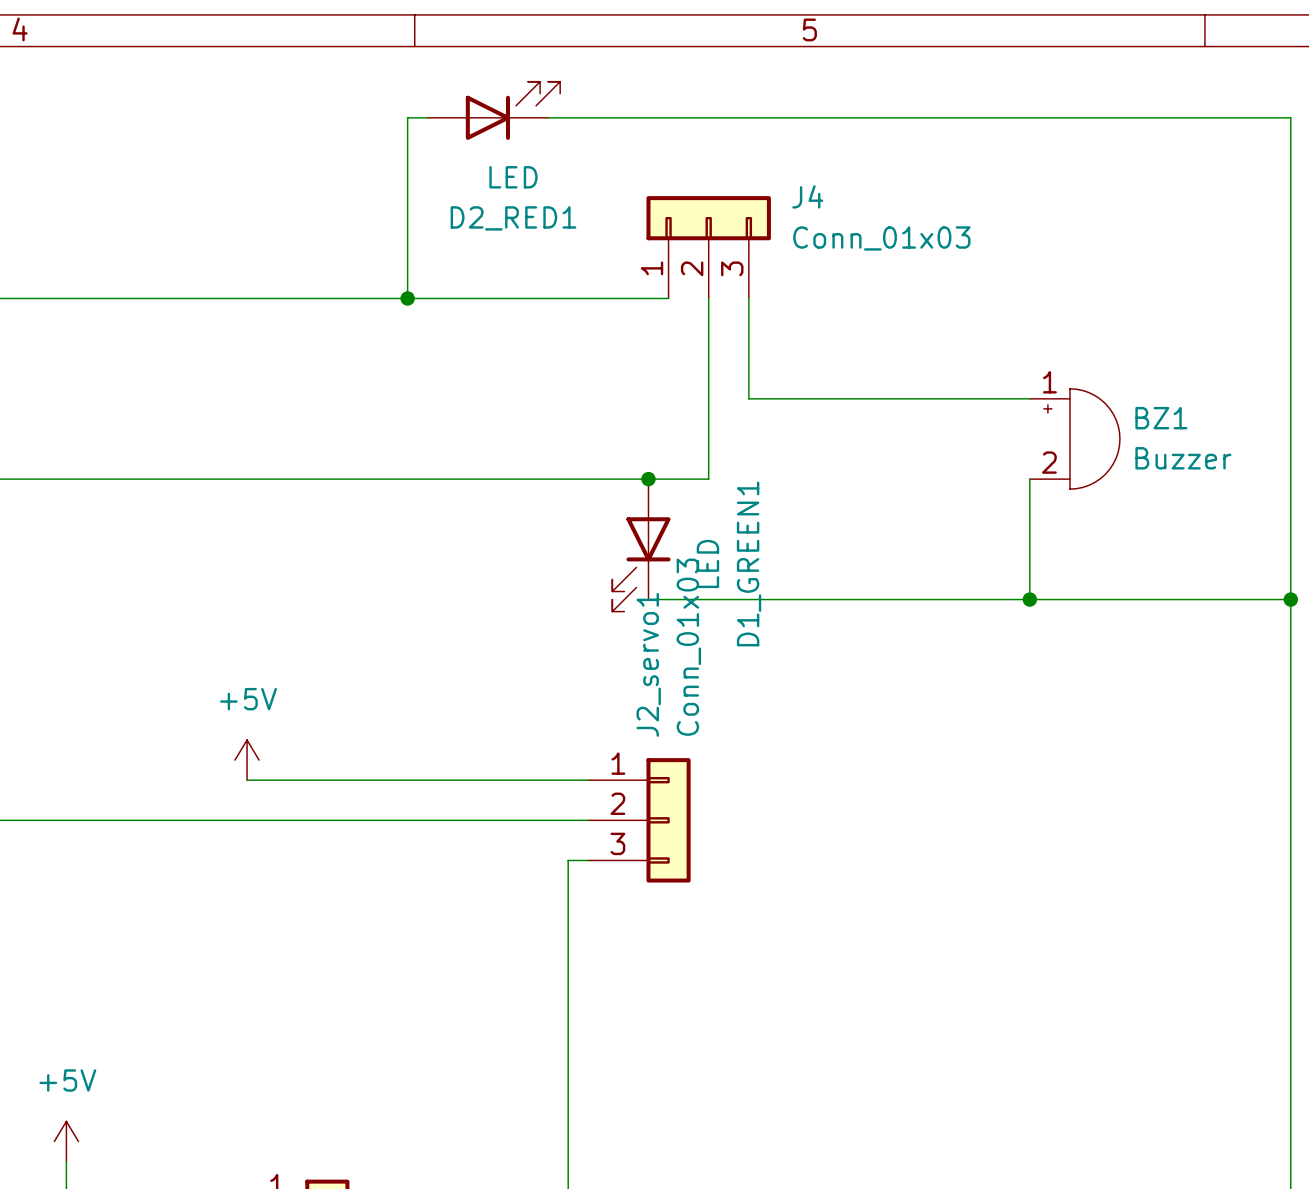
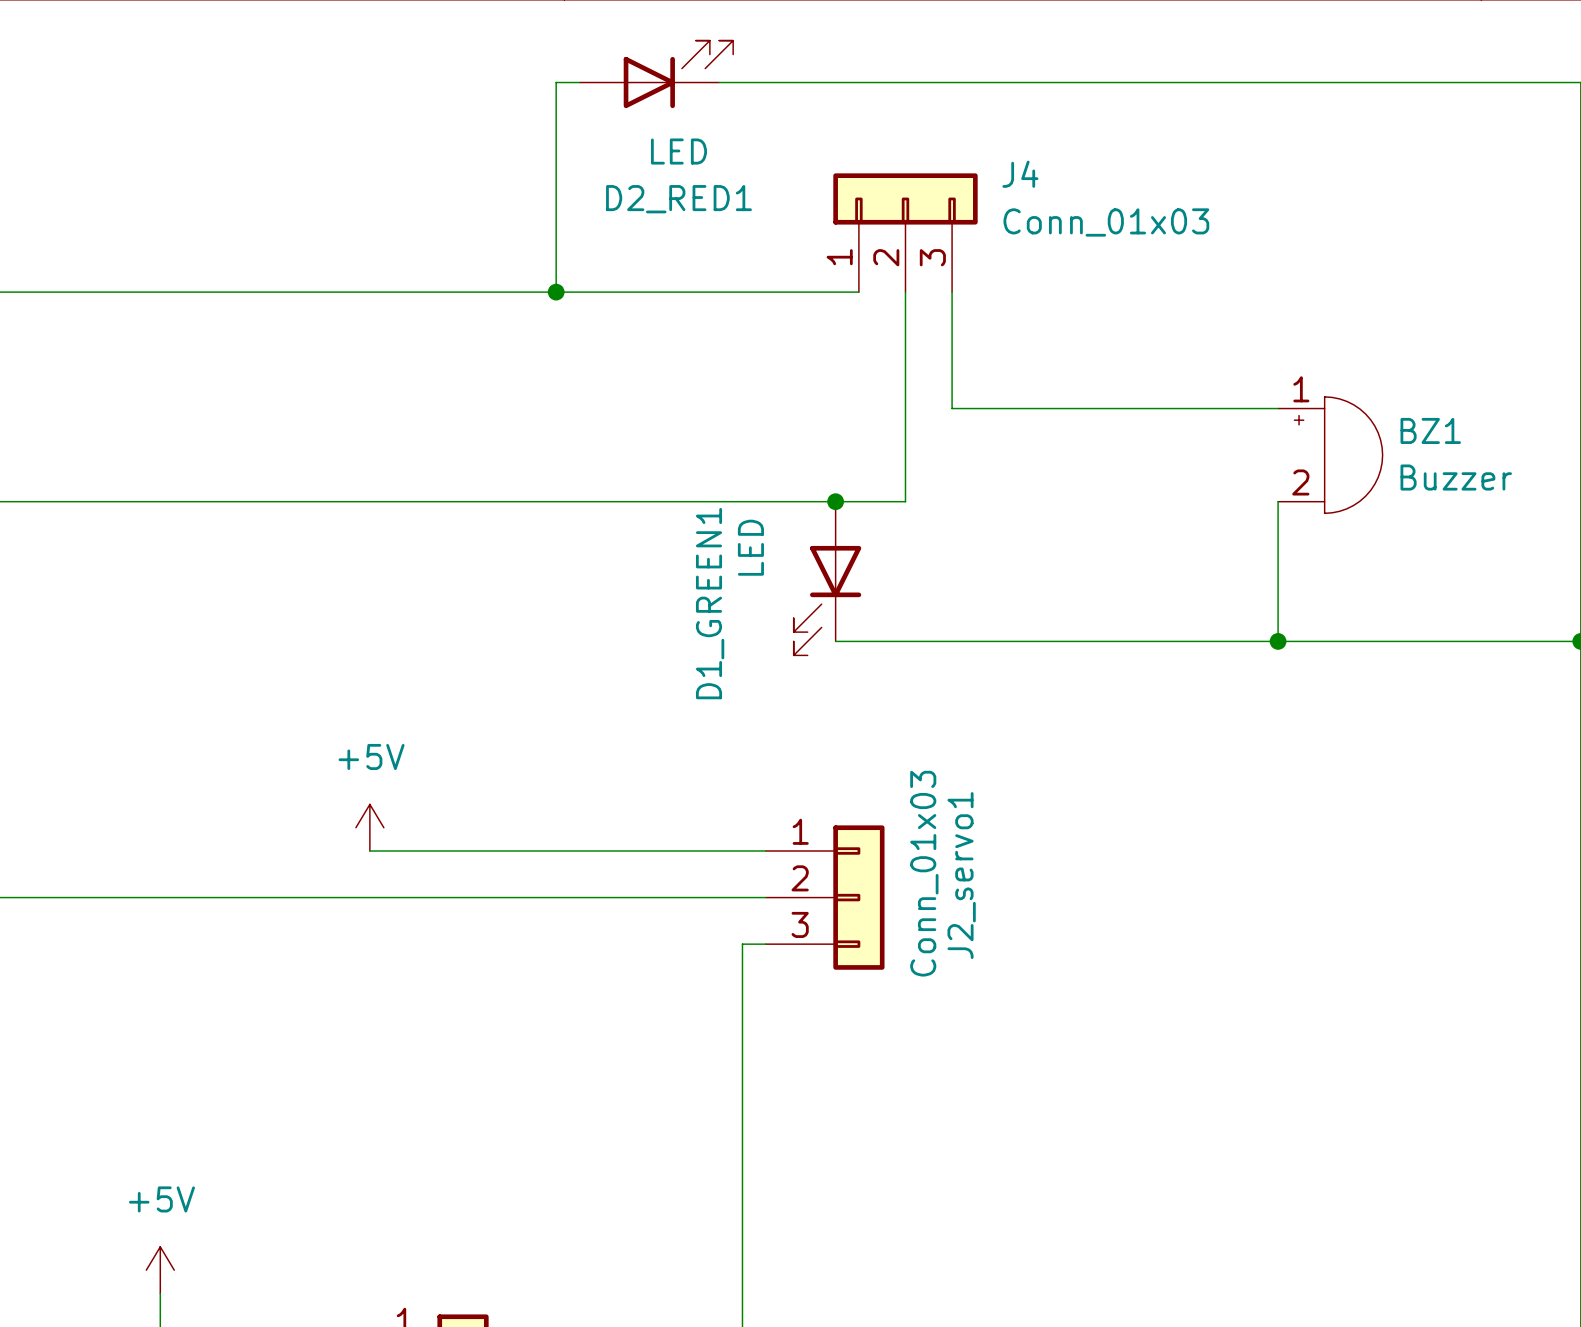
D1_GREEN1 value position: LED (707, 563) -> LED (750, 547)
D1_GREEN1 name position: D1_GREEN1 (749, 563) -> D1_GREEN1 (710, 603)
J2_servo1 value position: Conn_01x03 (688, 647) -> Conn_01x03 (924, 873)
J2_servo1 name position: J2_servo1 (648, 664) -> J2_servo1 (961, 875)

